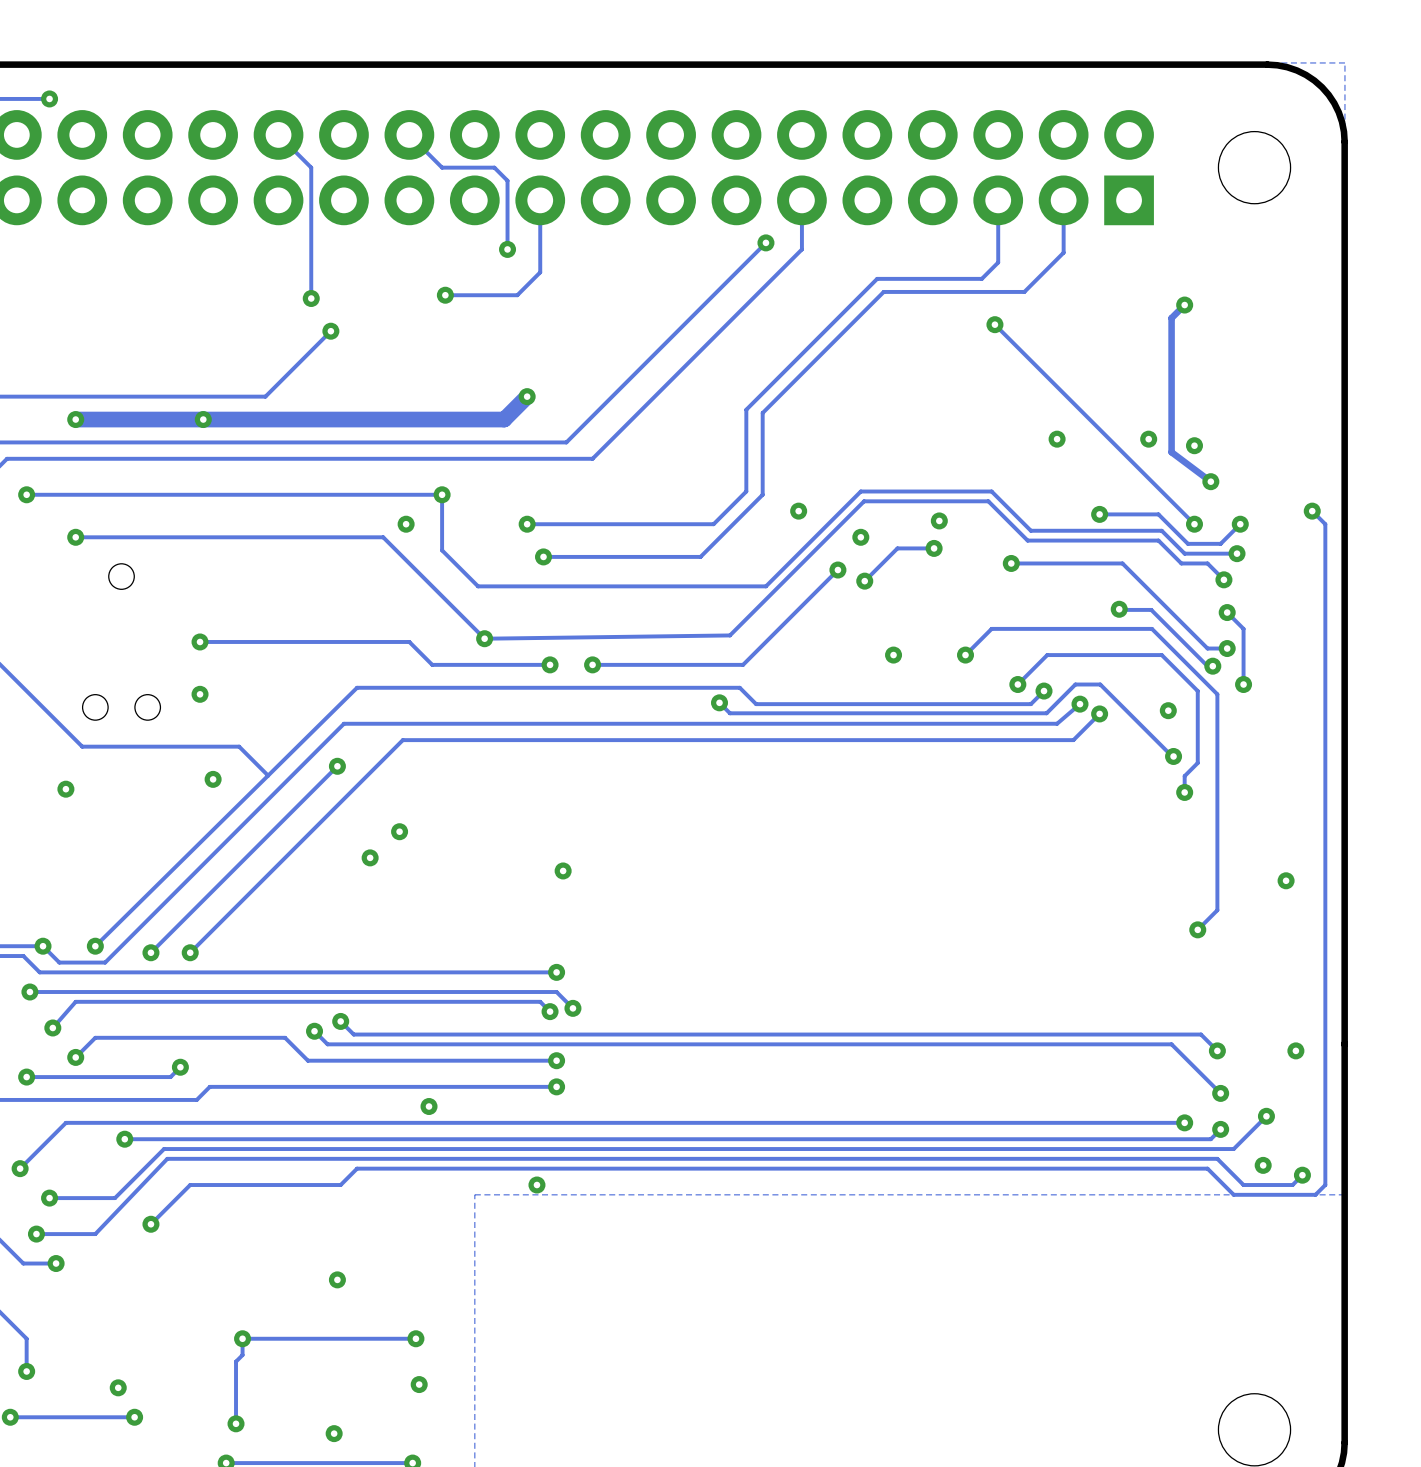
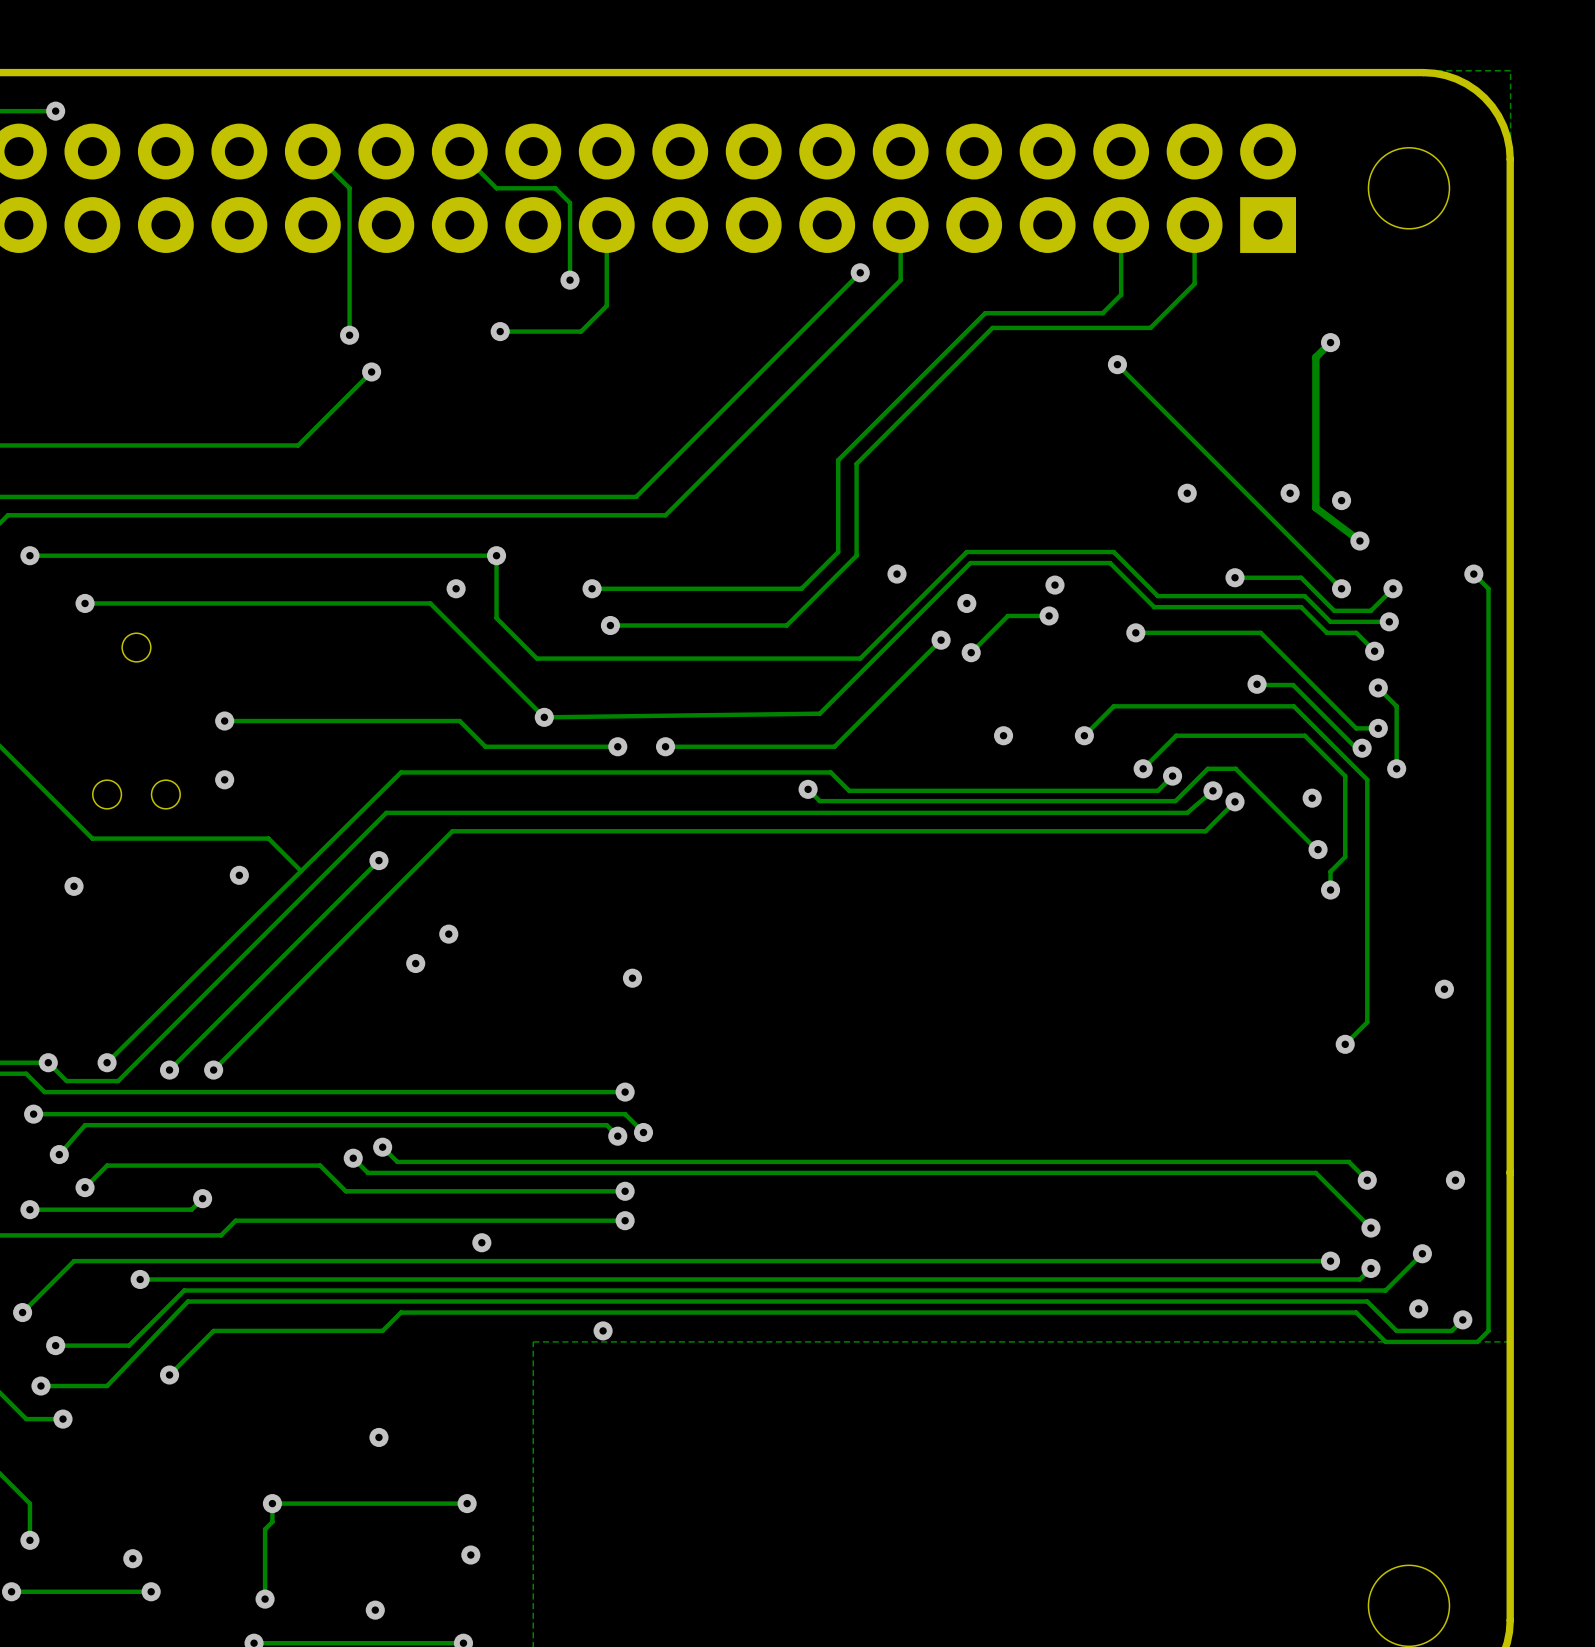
track: (527, 396) (504, 419) (78, 419) -> none
via: (527, 396) -> none
via: (75, 419) -> none
via: (203, 419) -> none

